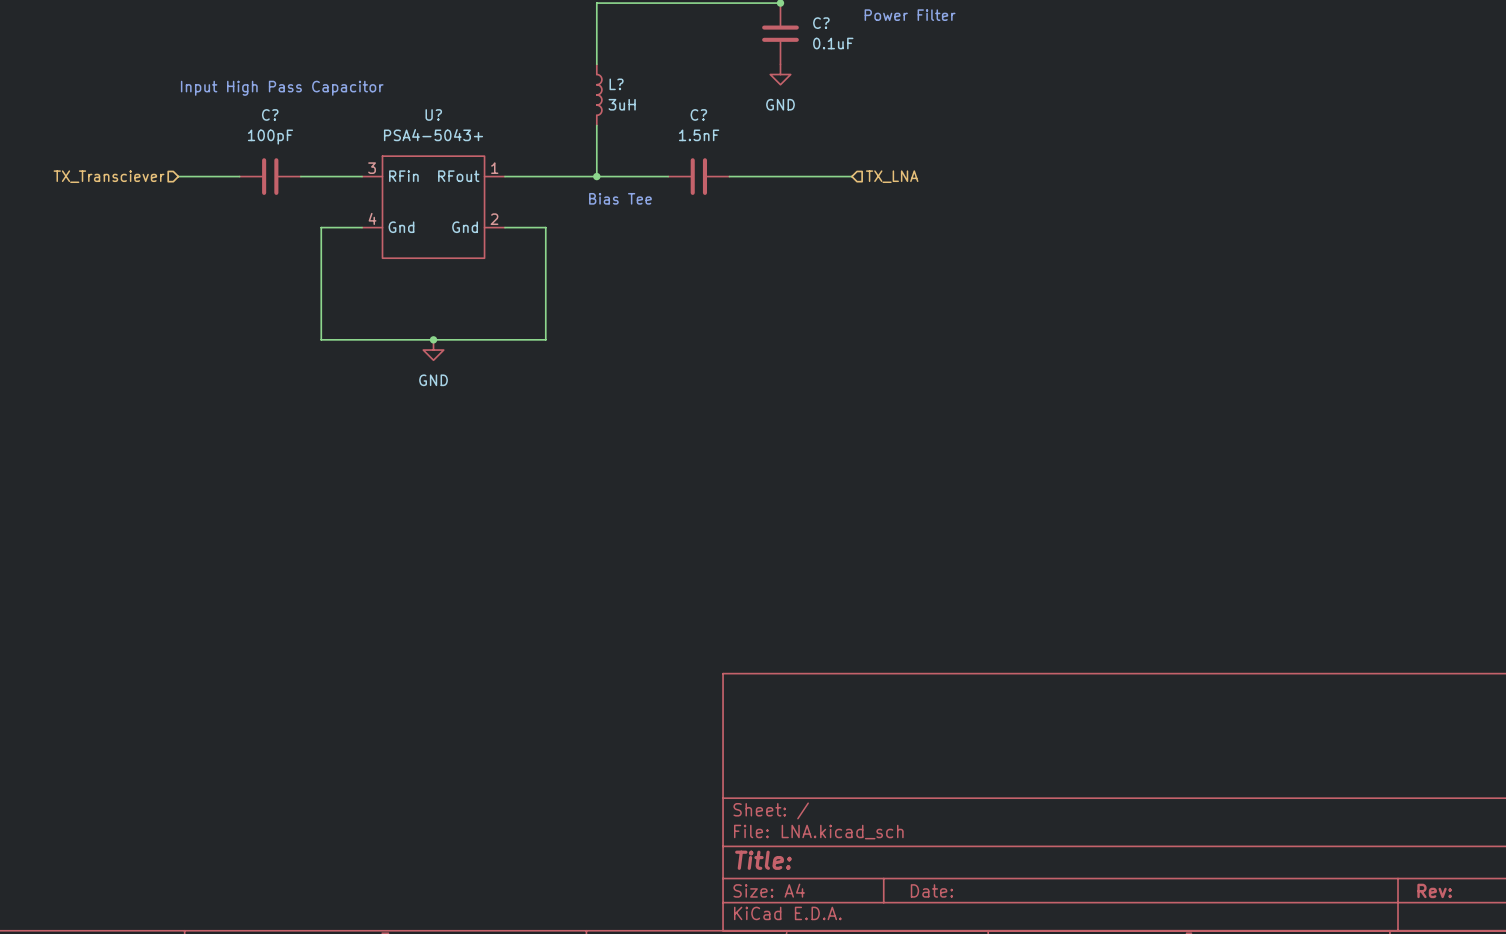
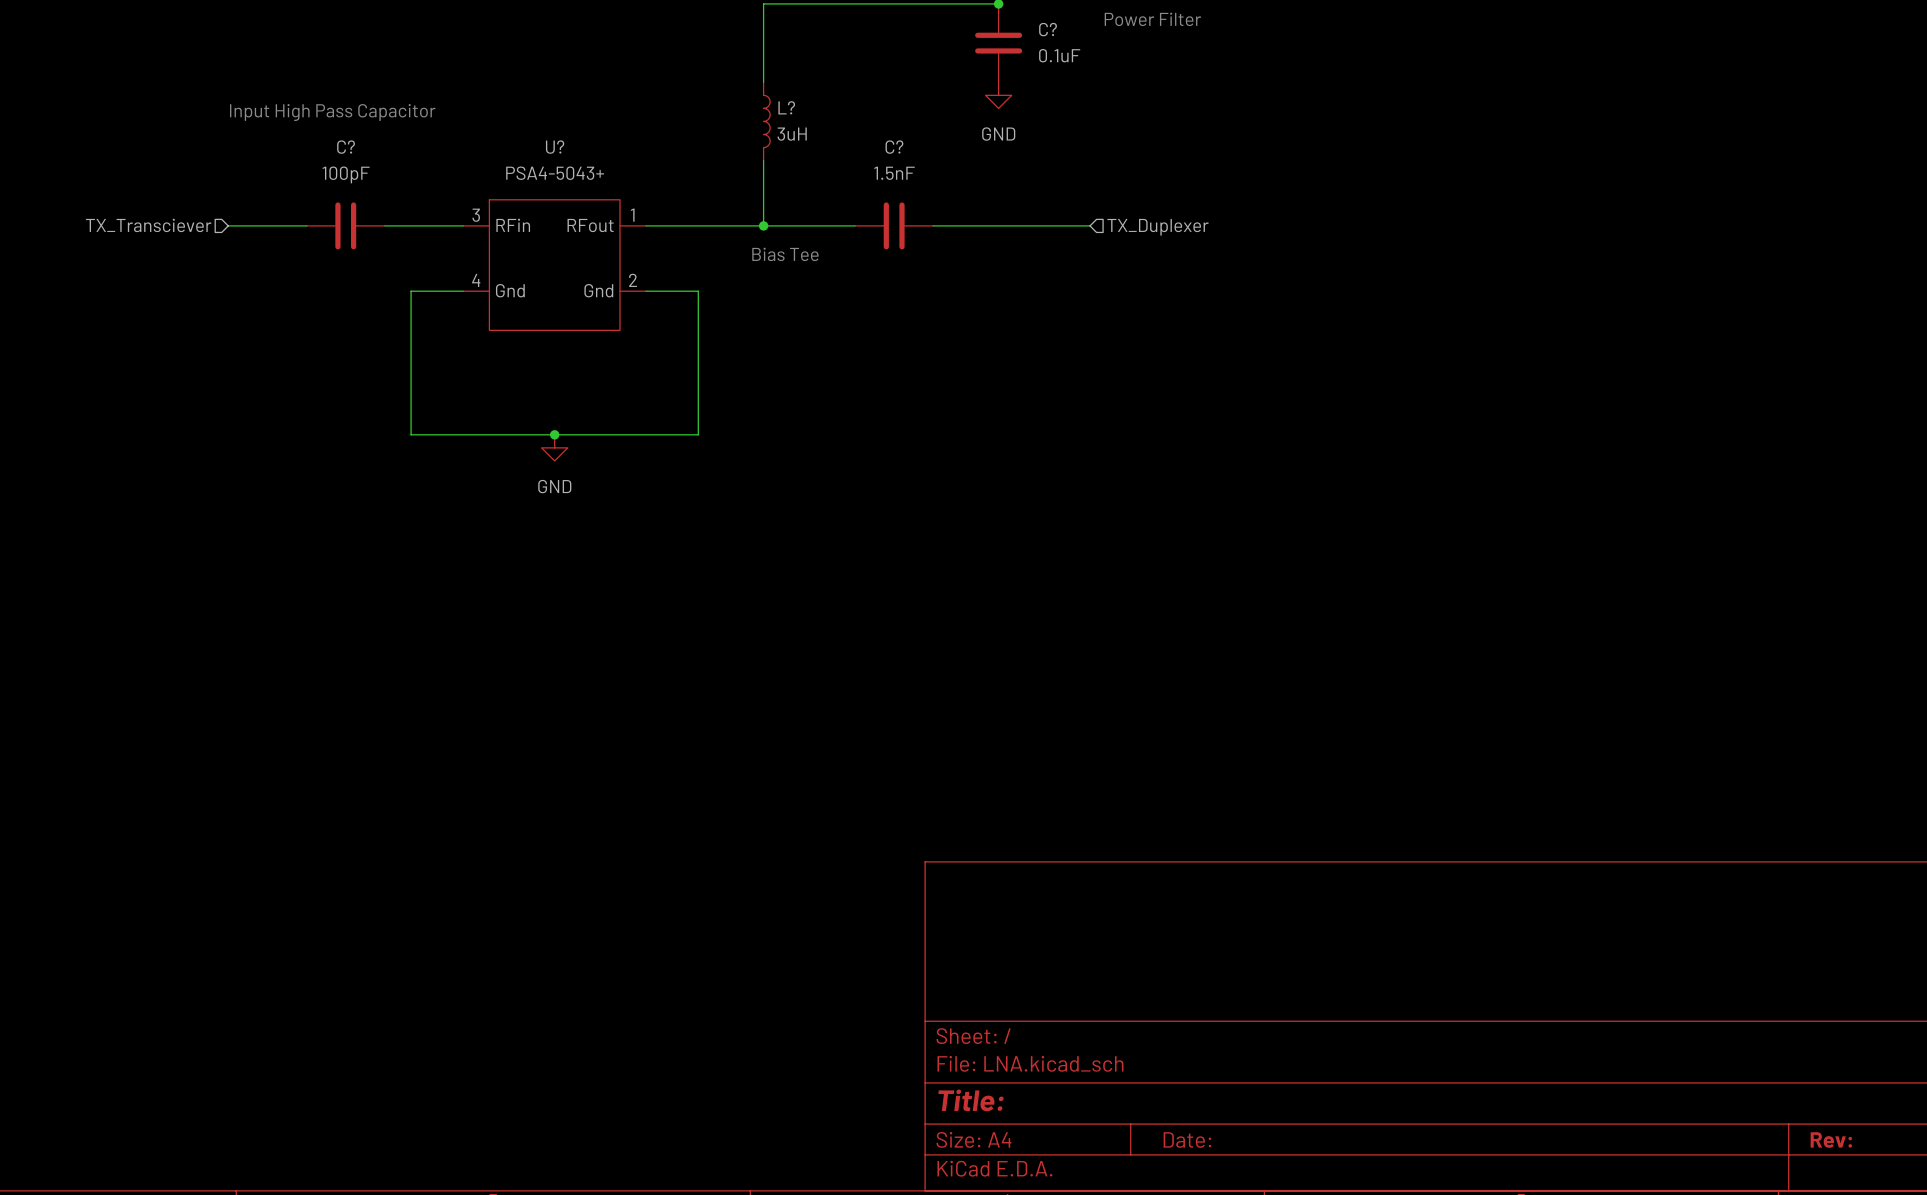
hierarchical label: TX_LNA (892, 176) -> TX_Duplexer (1158, 227)

